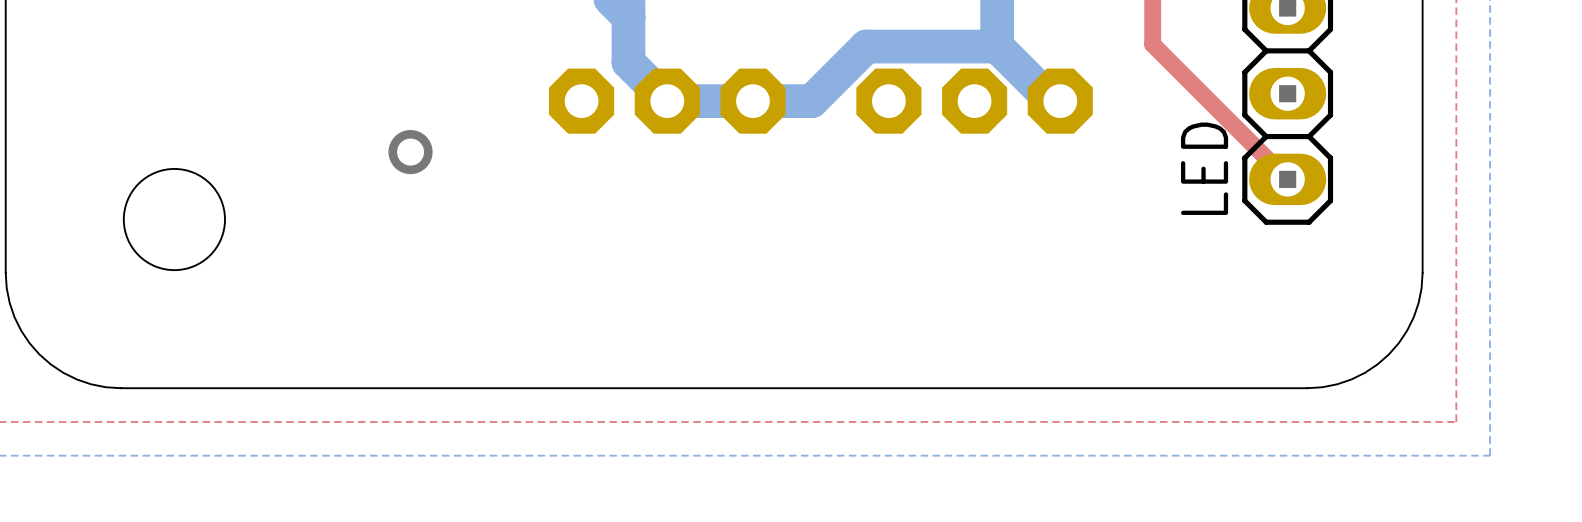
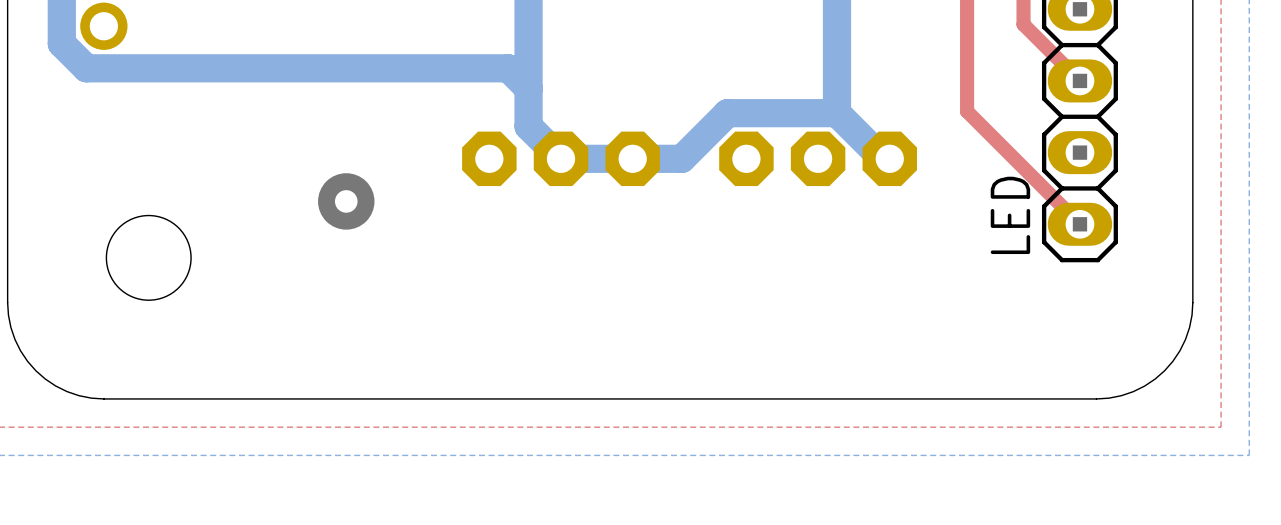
via size: [388, 130, 433, 175] -> [318, 173, 375, 230]

